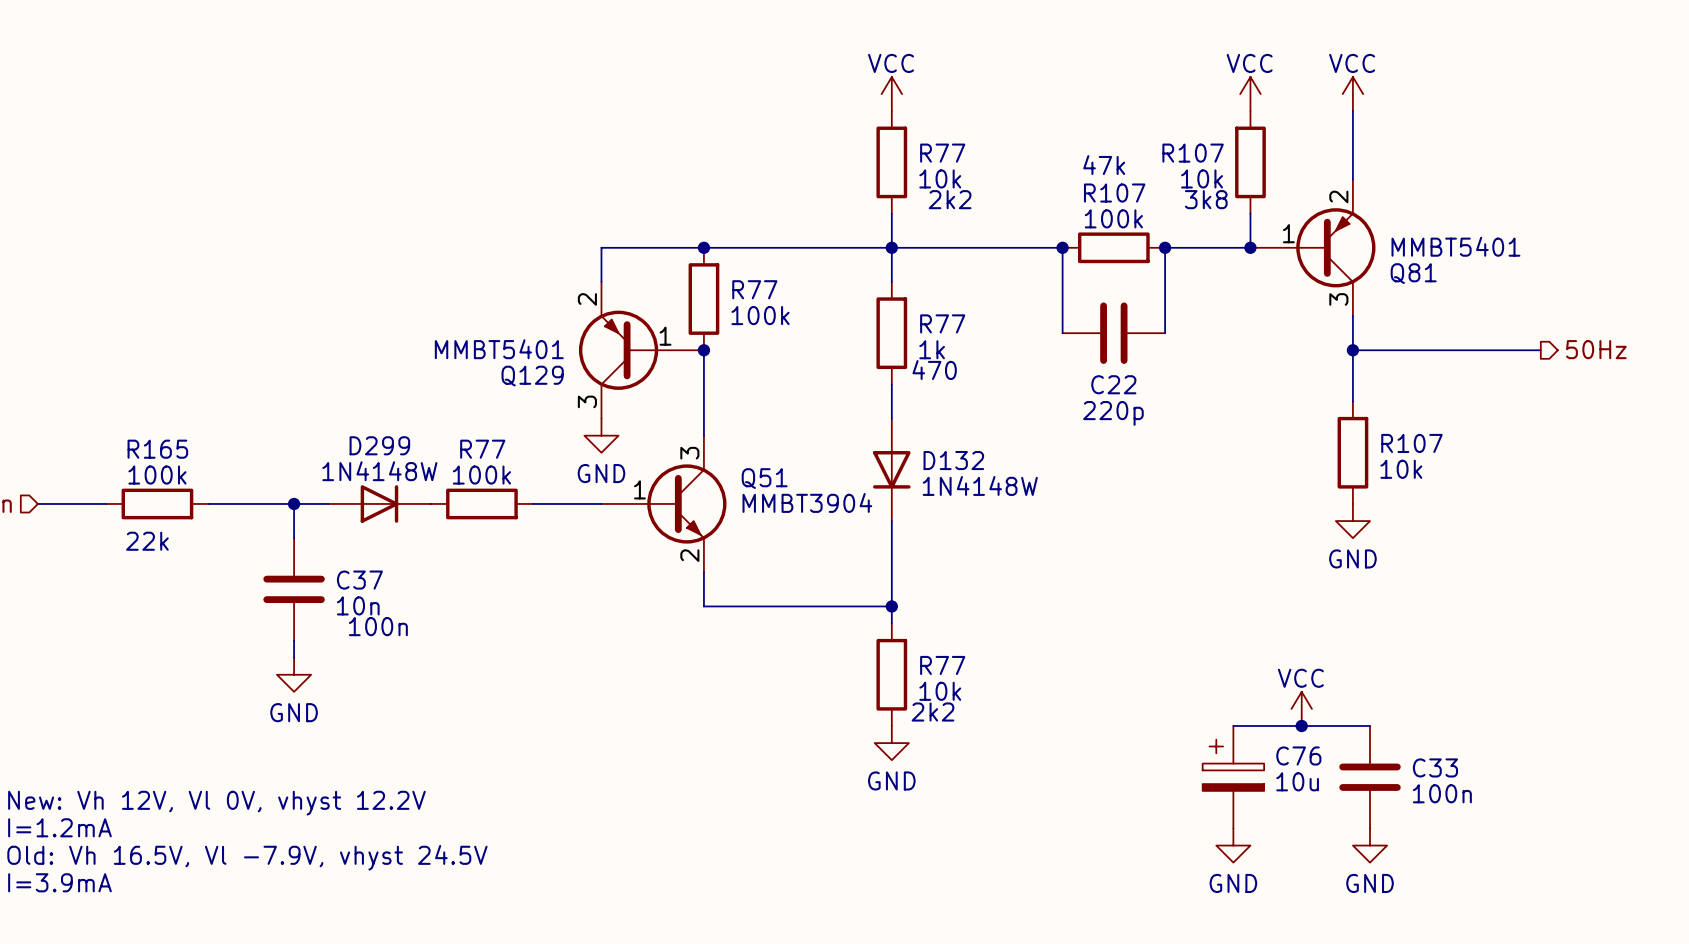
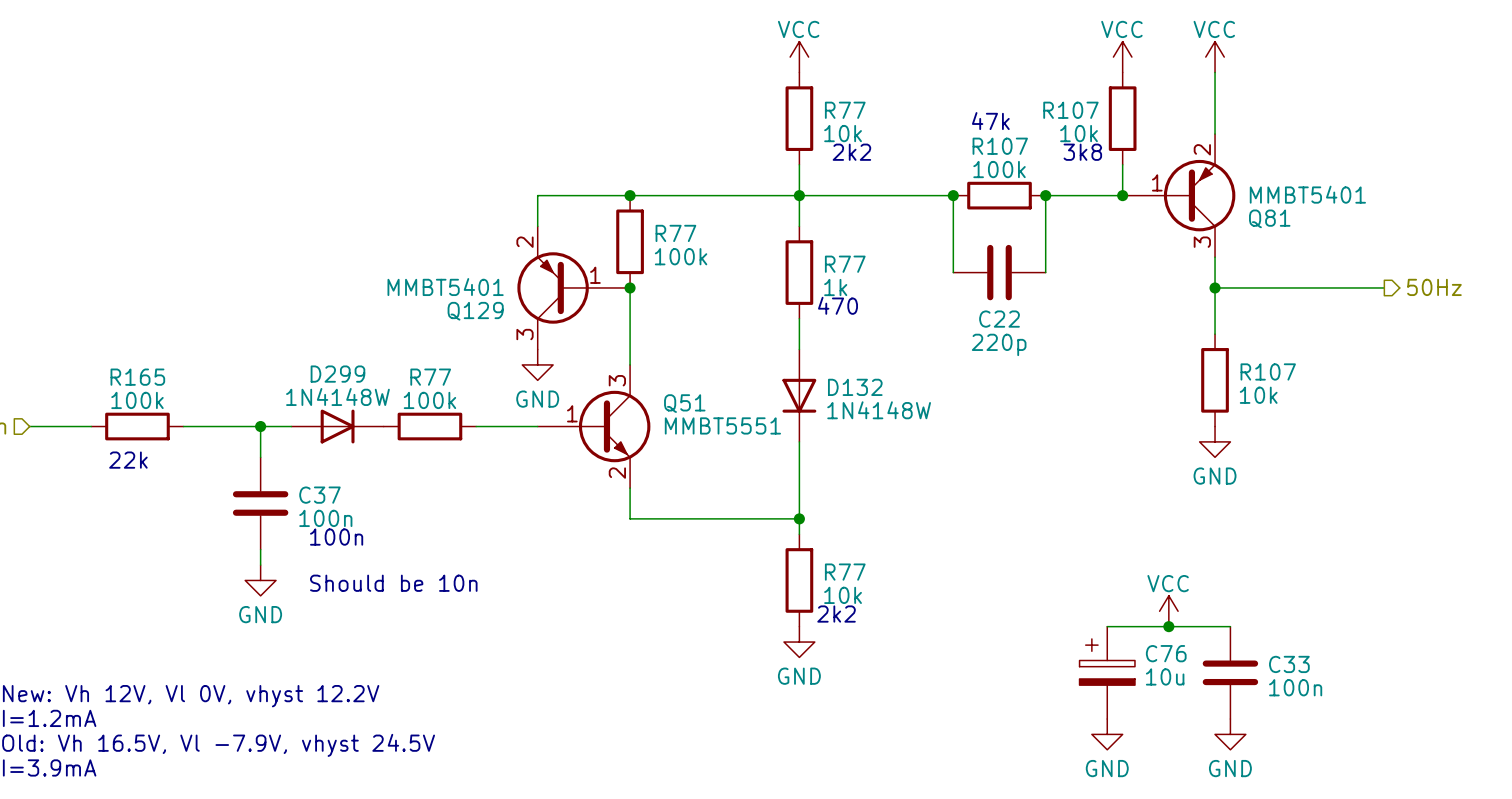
Q51 value: MMBT3904 (807, 502) -> MMBT5551 (722, 425)
C37 value: 10n (358, 605) -> 100n (325, 518)
text: none -> Should be 10n (393, 583)

